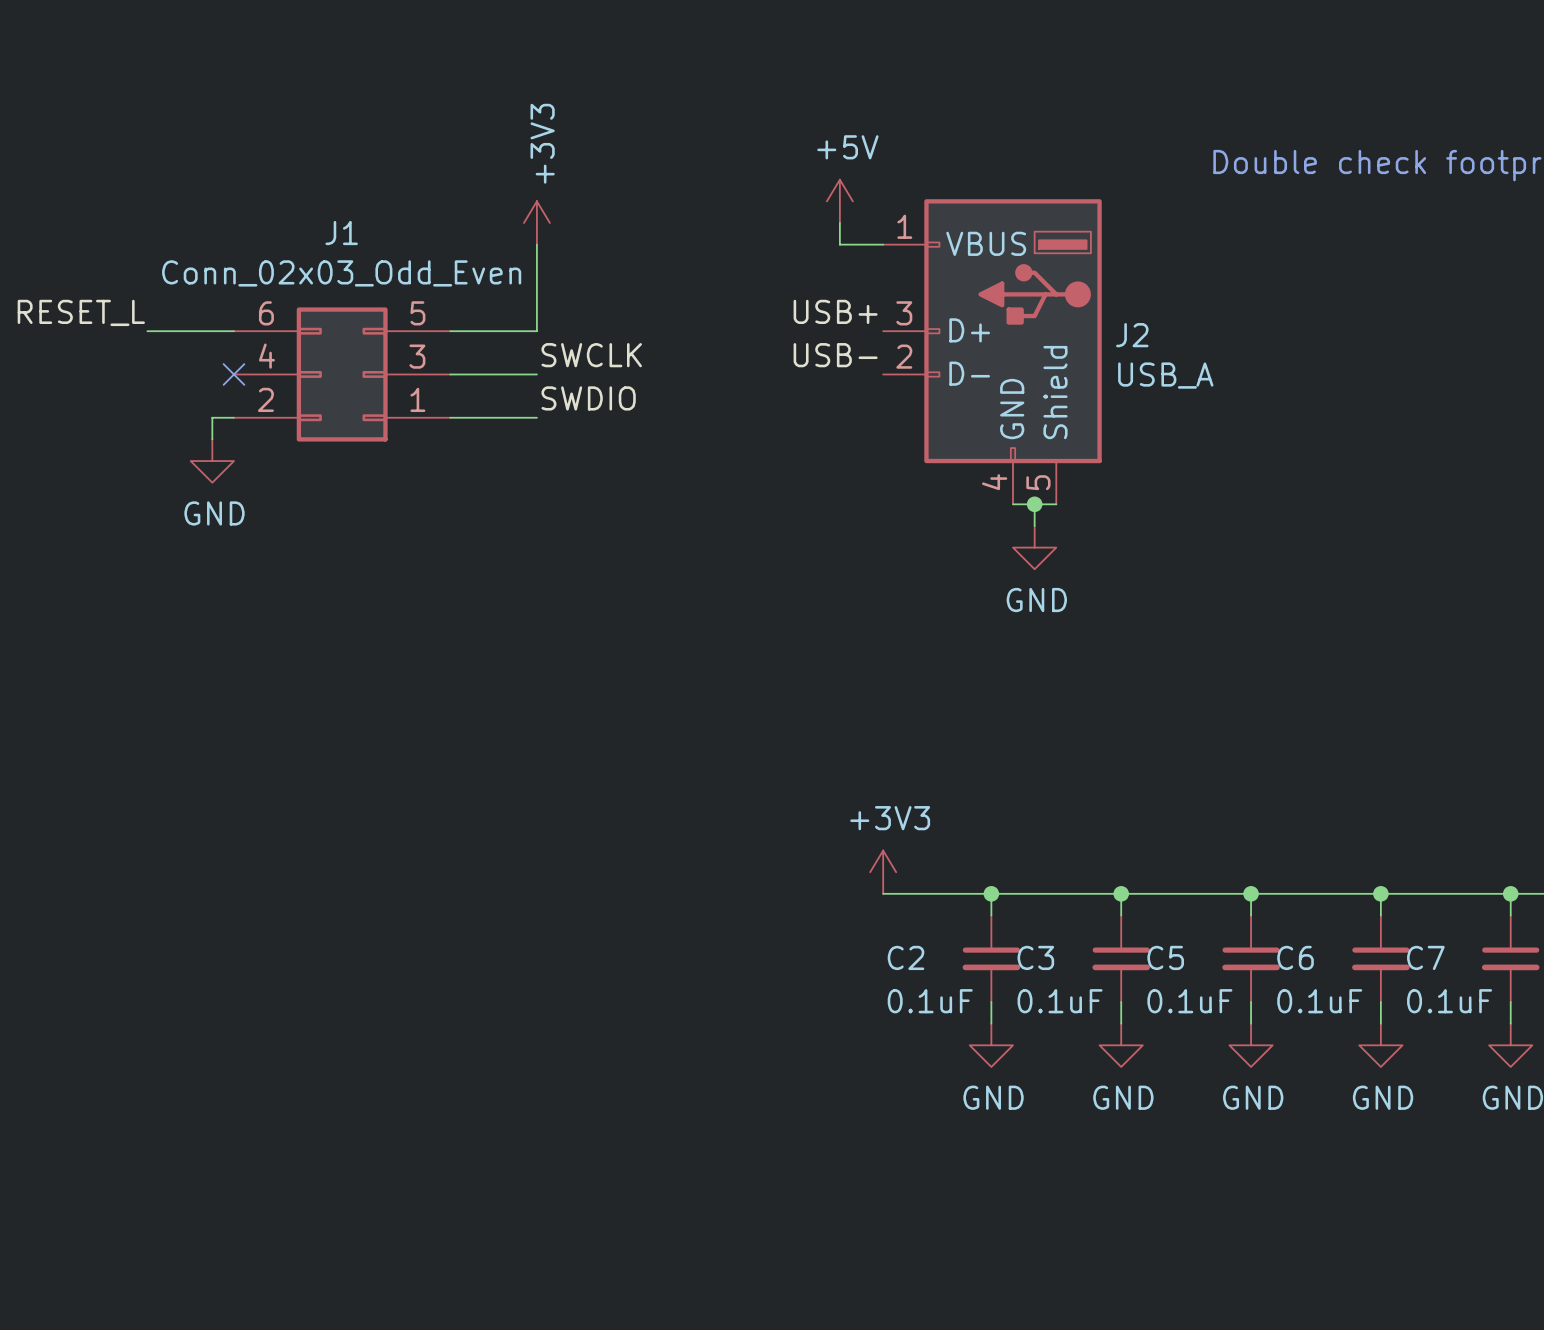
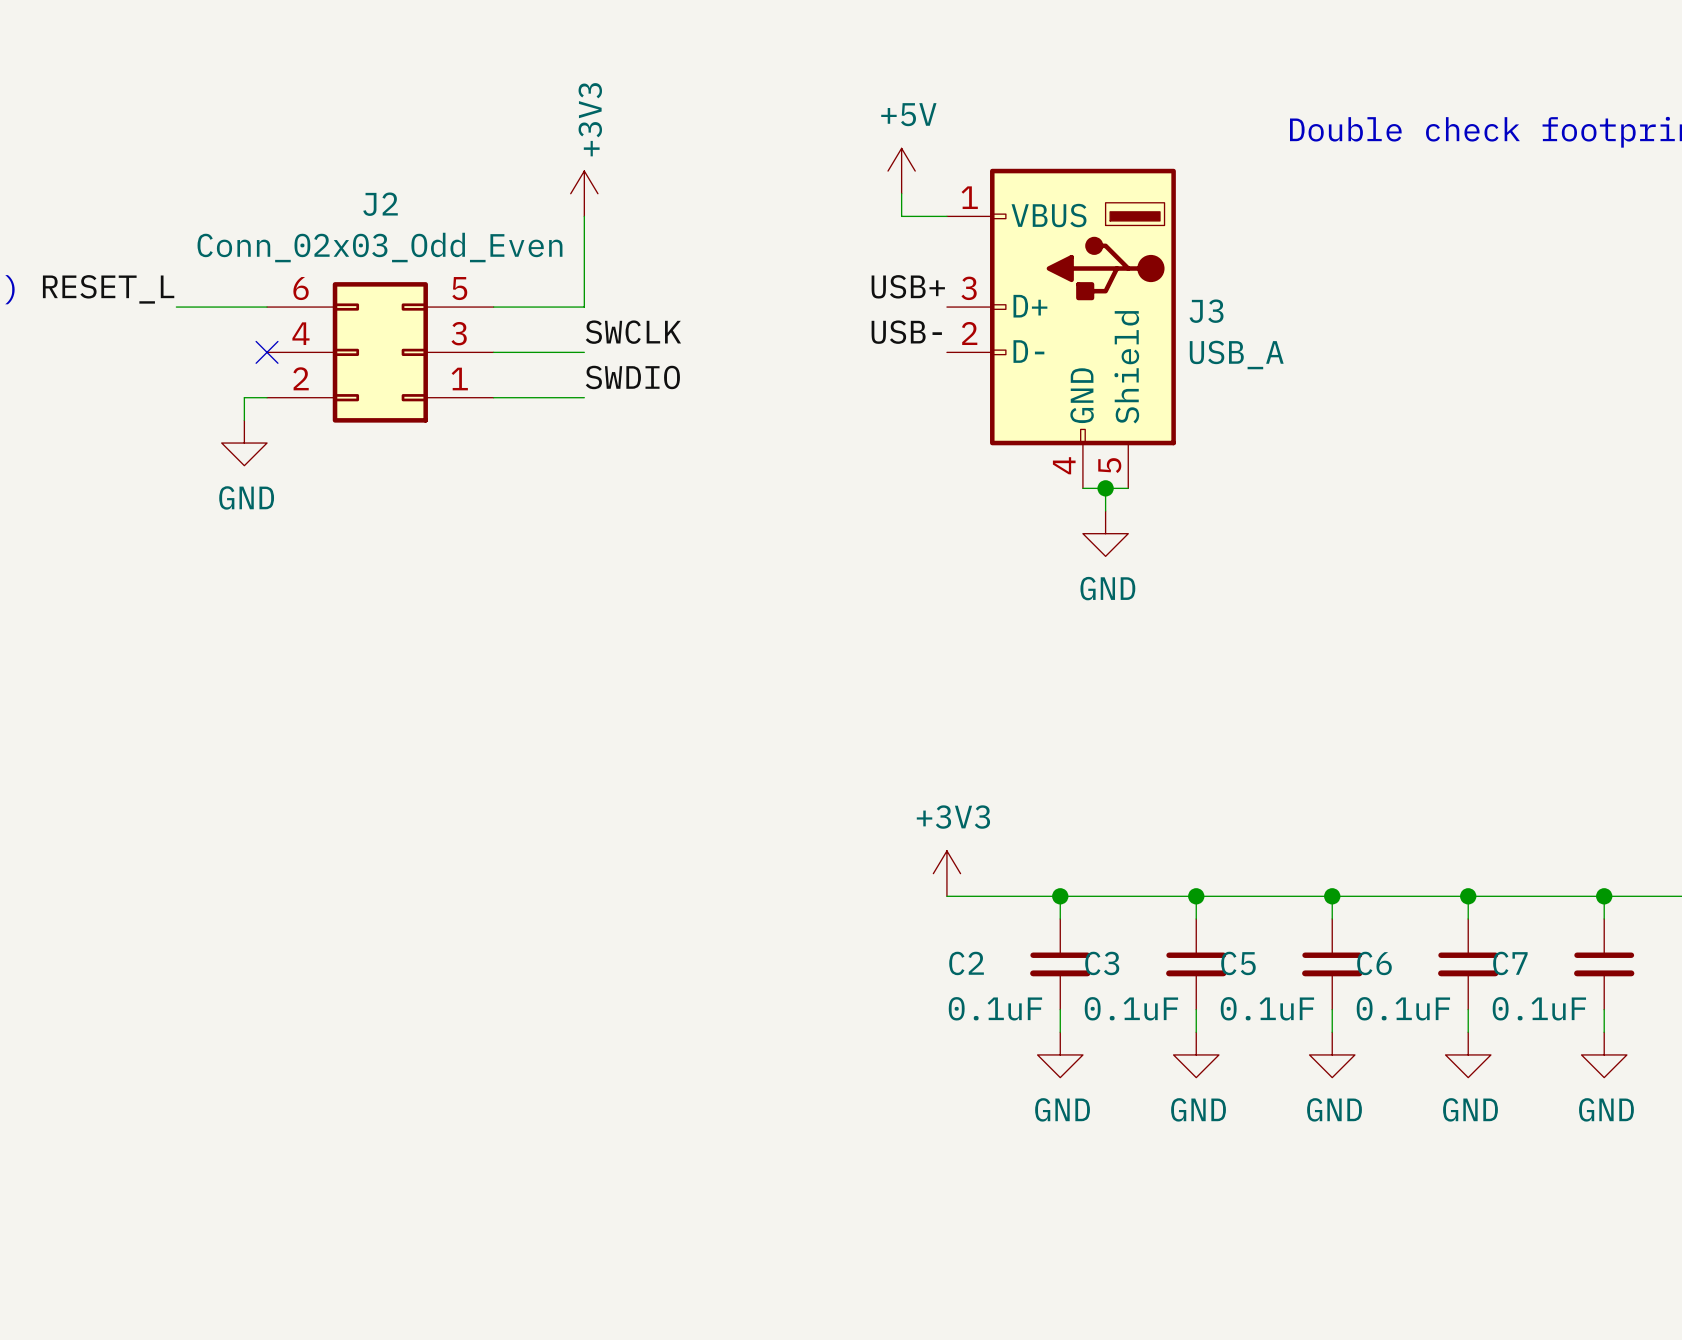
J1 name: J1 (341, 233) -> J2 (380, 204)
J2 name: J2 (1132, 335) -> J3 (1206, 311)

